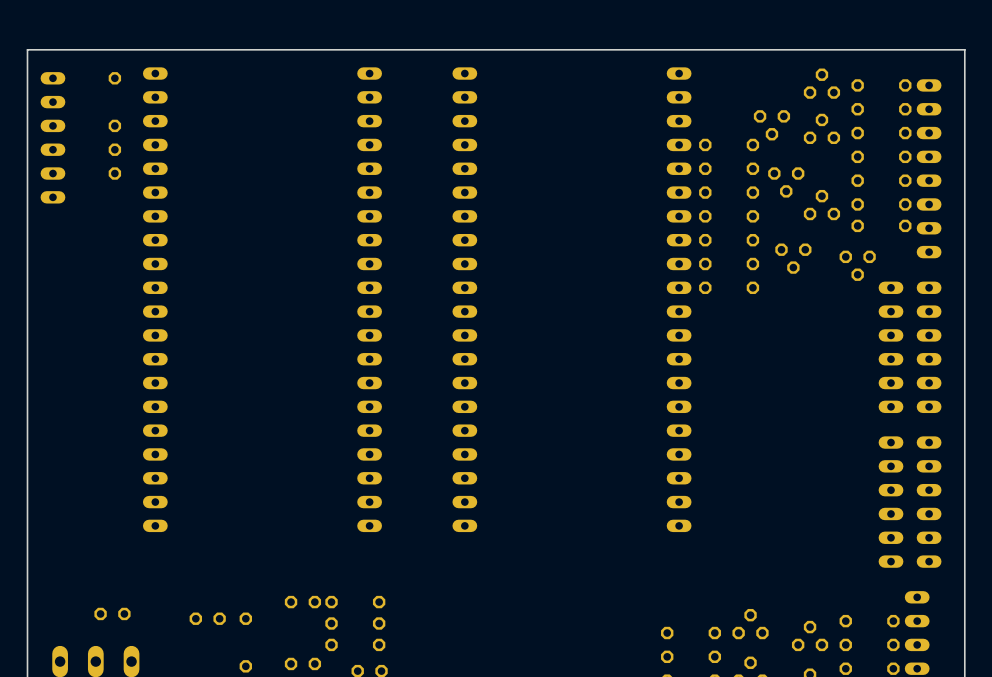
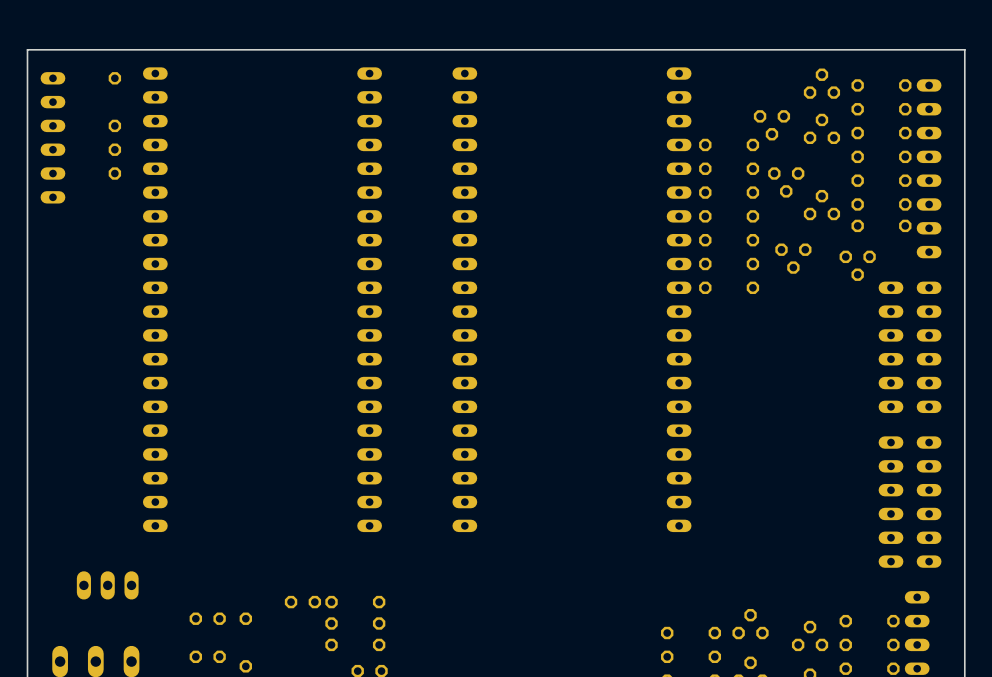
part: none -> (107, 585)
part: (112, 613) -> none
part: none -> (207, 656)
part: (302, 663) -> none

